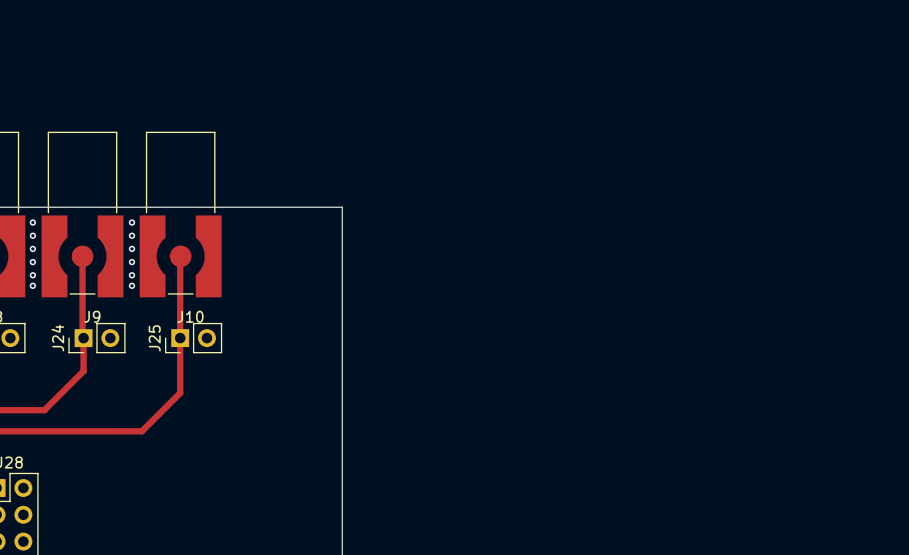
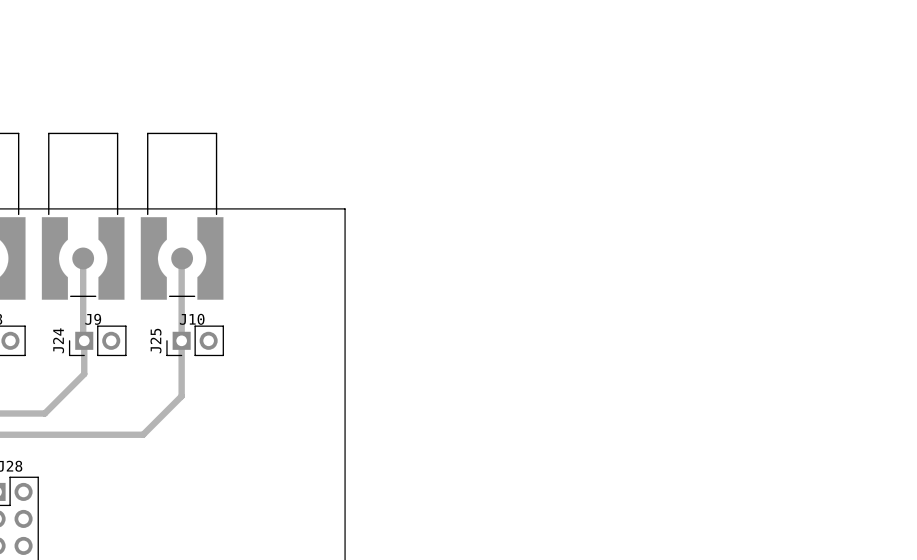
via: (32, 222) -> none
via: (131, 222) -> none
via: (32, 235) -> none
via: (131, 235) -> none
via: (32, 248) -> none
via: (131, 248) -> none
via: (32, 262) -> none
via: (131, 262) -> none
via: (32, 275) -> none
via: (131, 275) -> none
via: (32, 285) -> none
via: (131, 285) -> none

